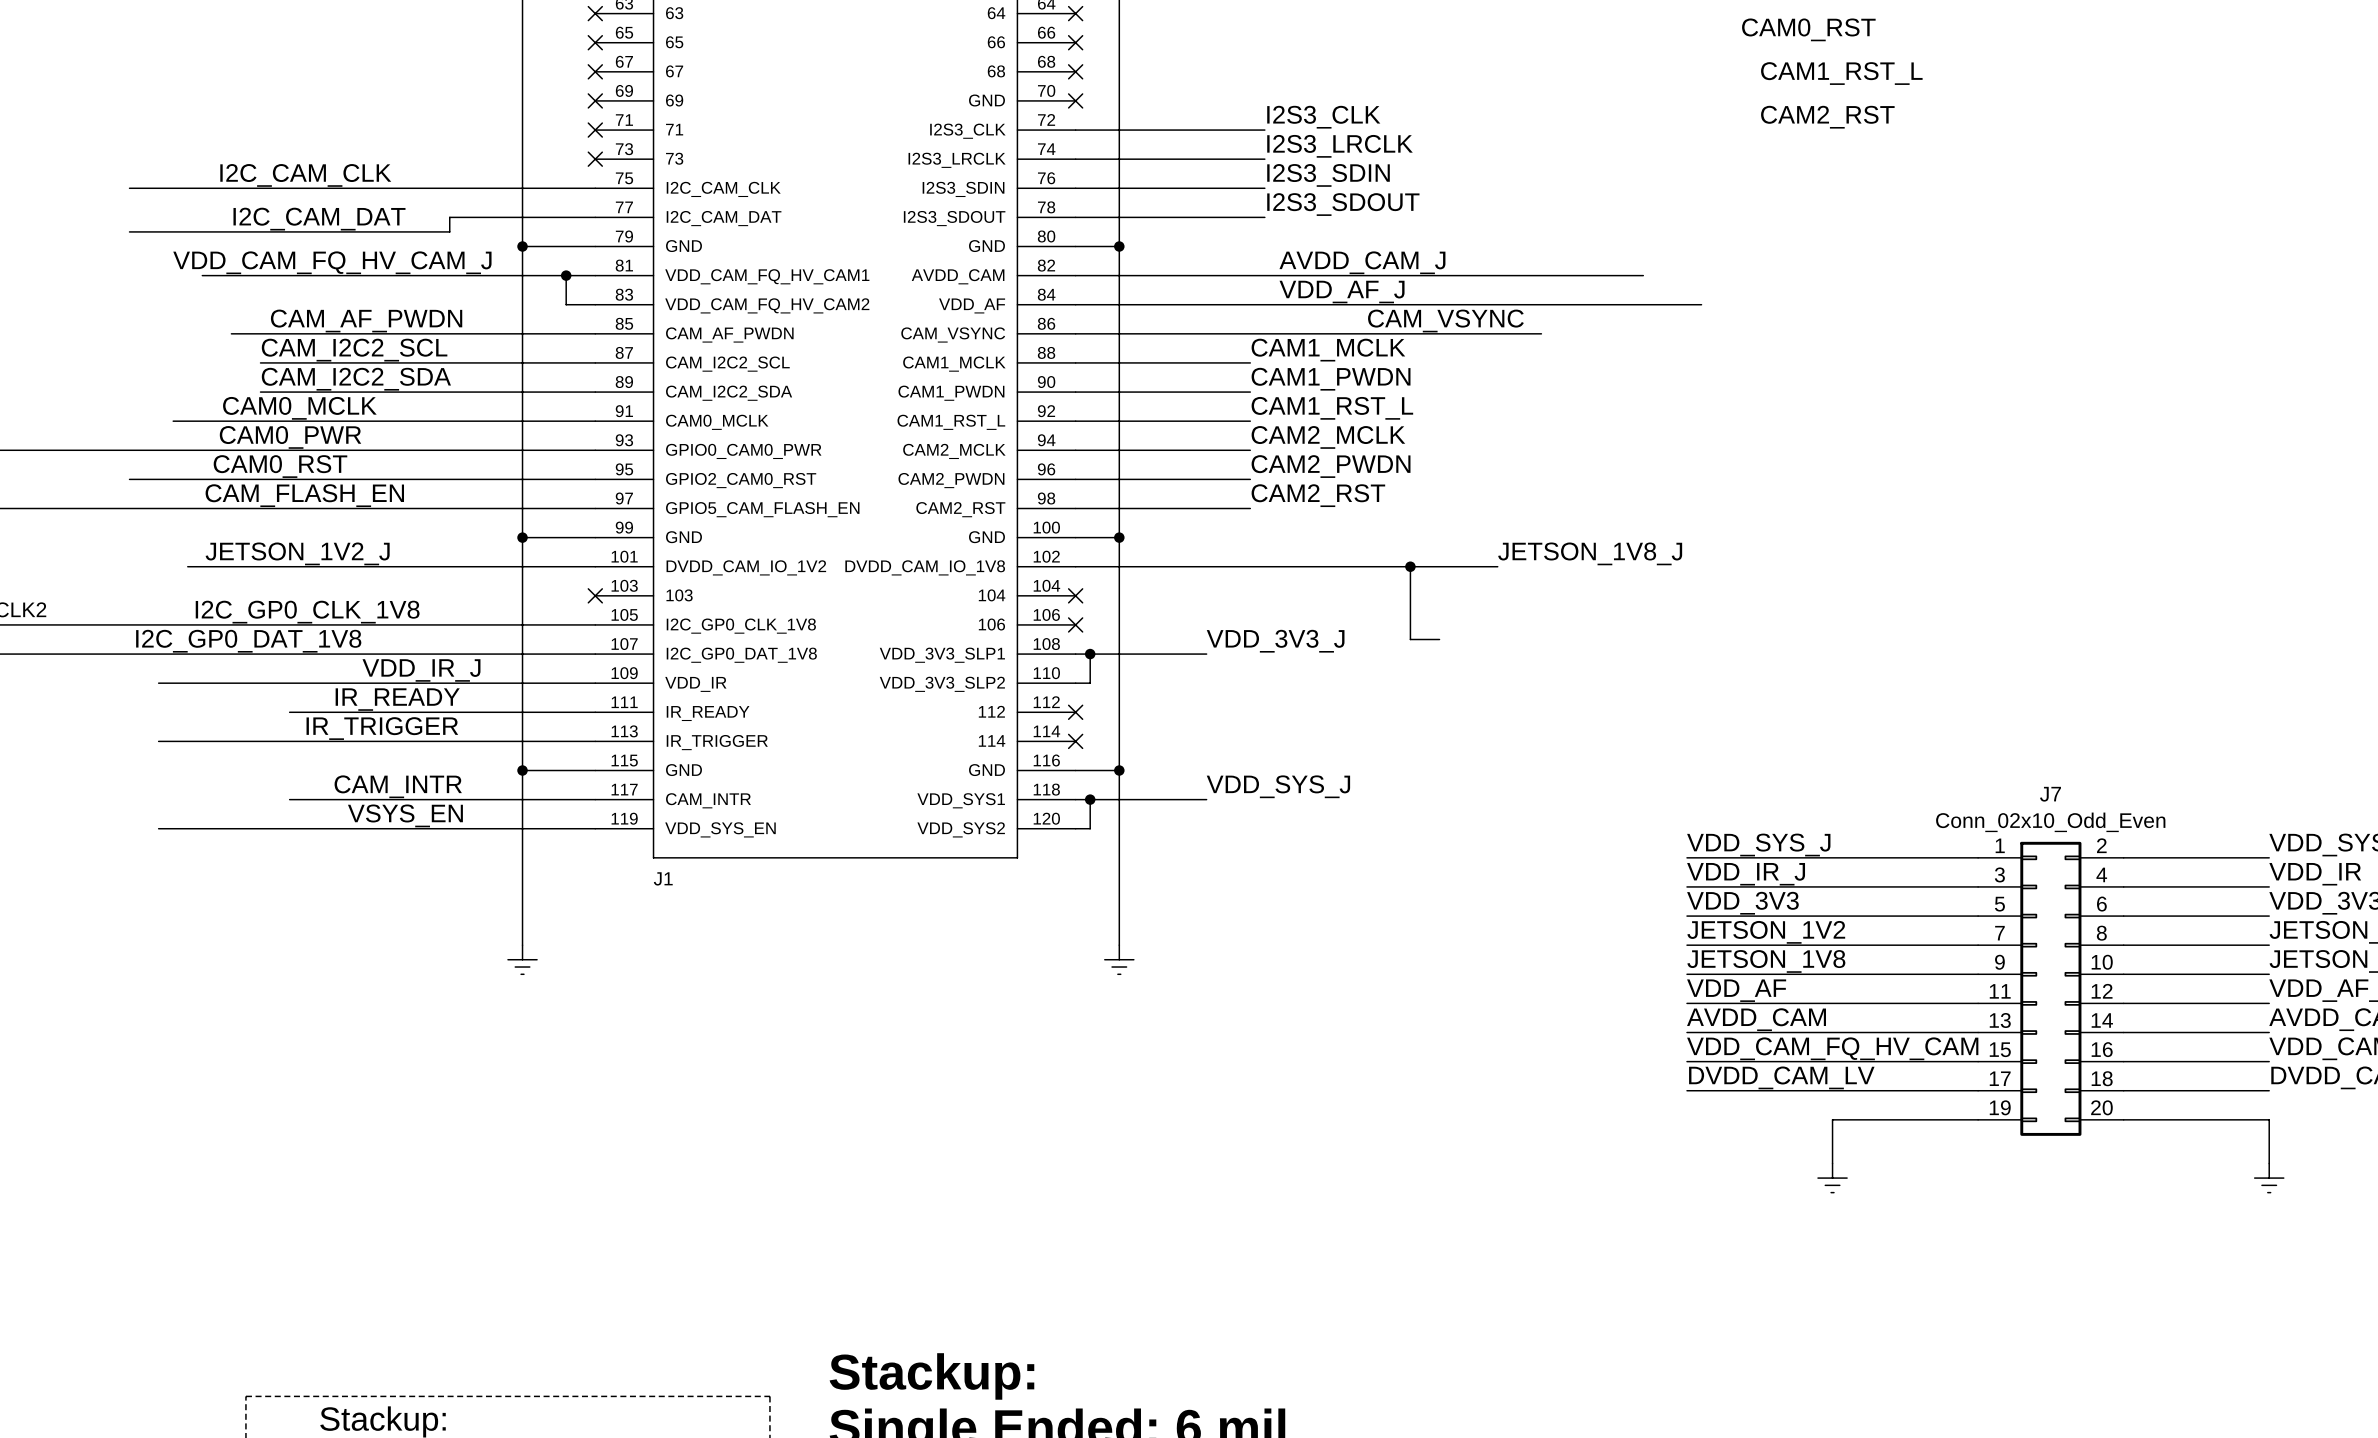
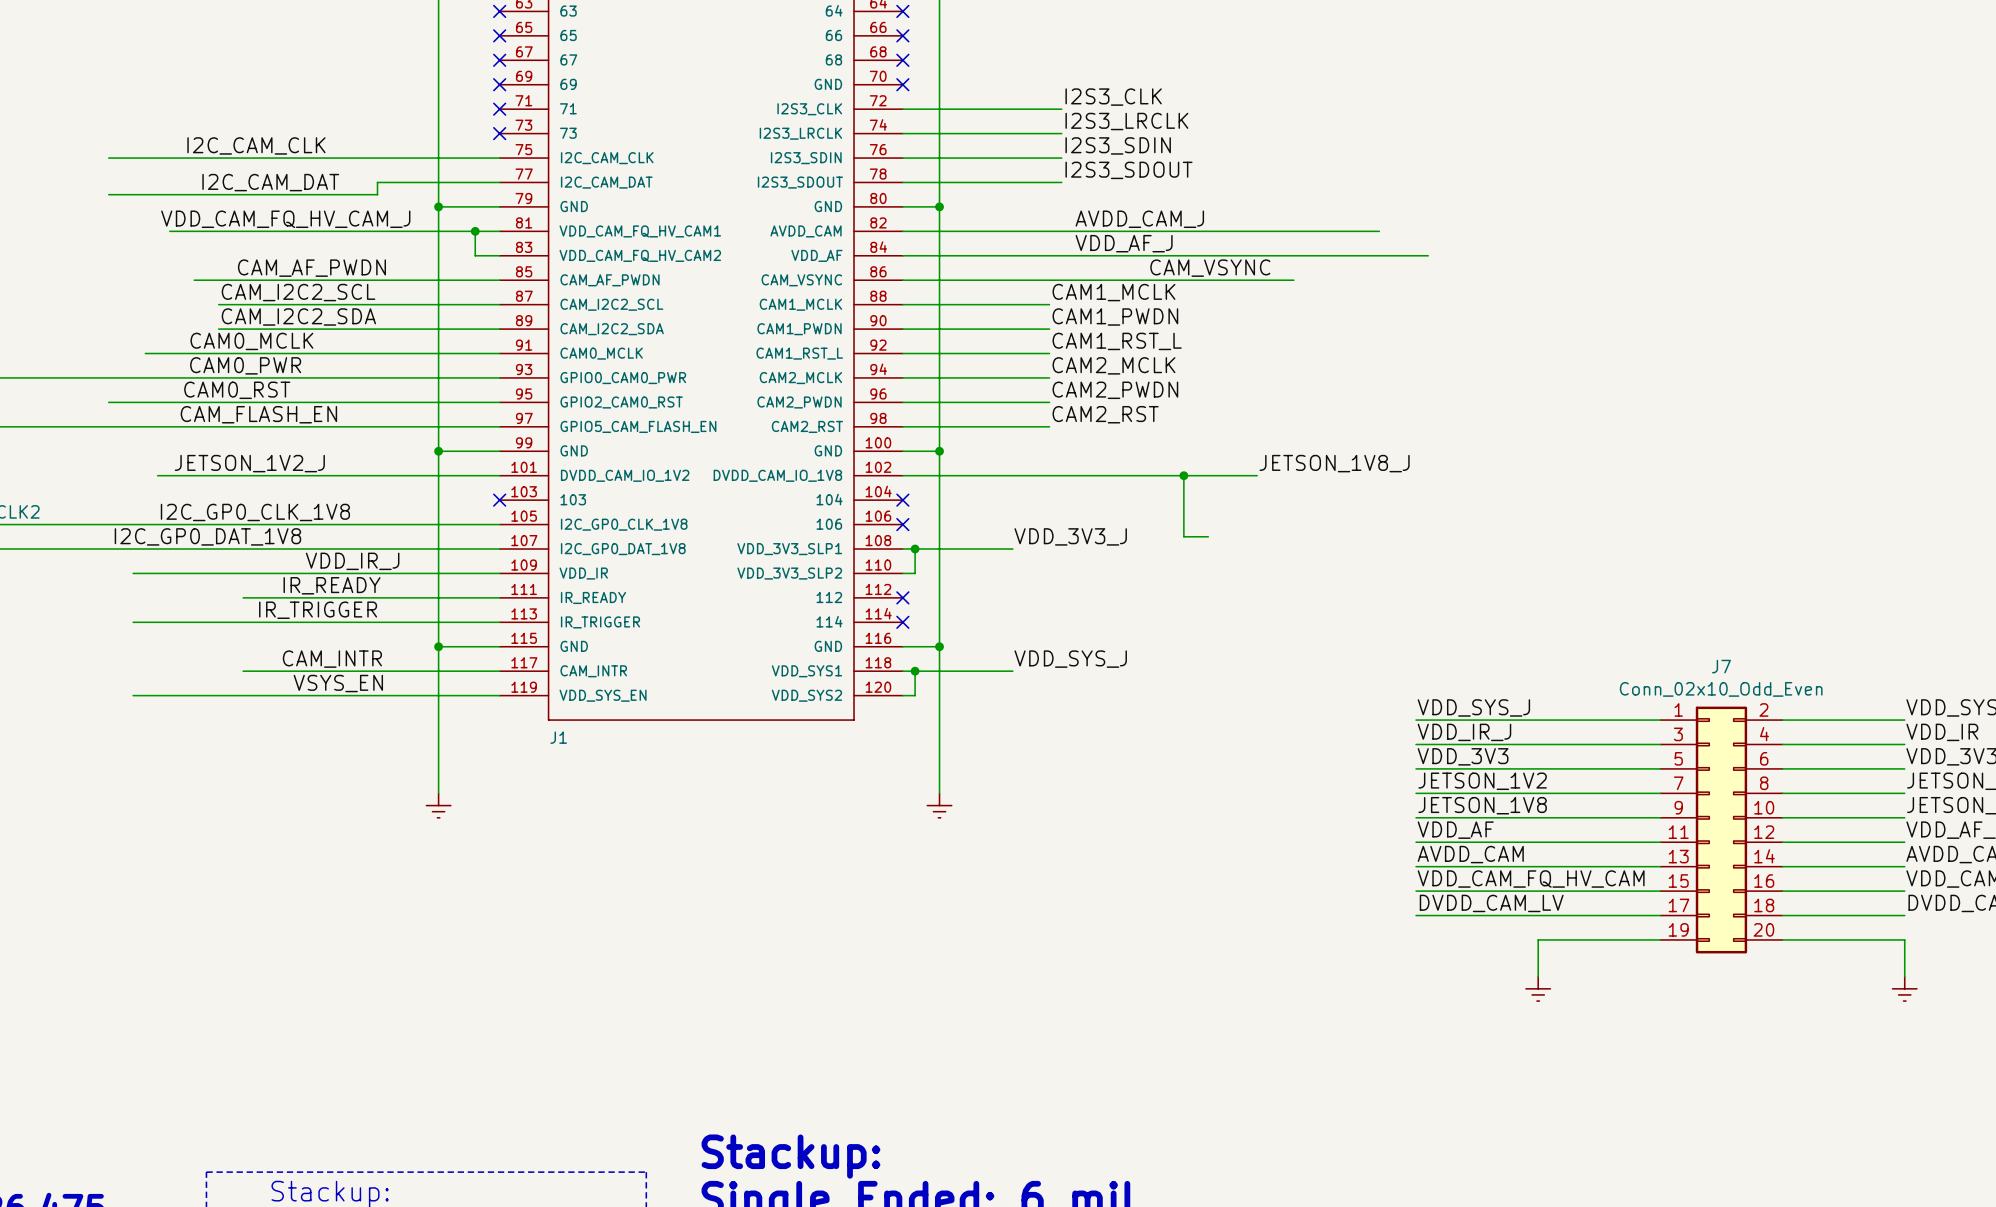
label: CAM0_RST (1808, 29) -> none
label: CAM1_RST_L (1841, 73) -> none
label: CAM2_RST (1827, 117) -> none

